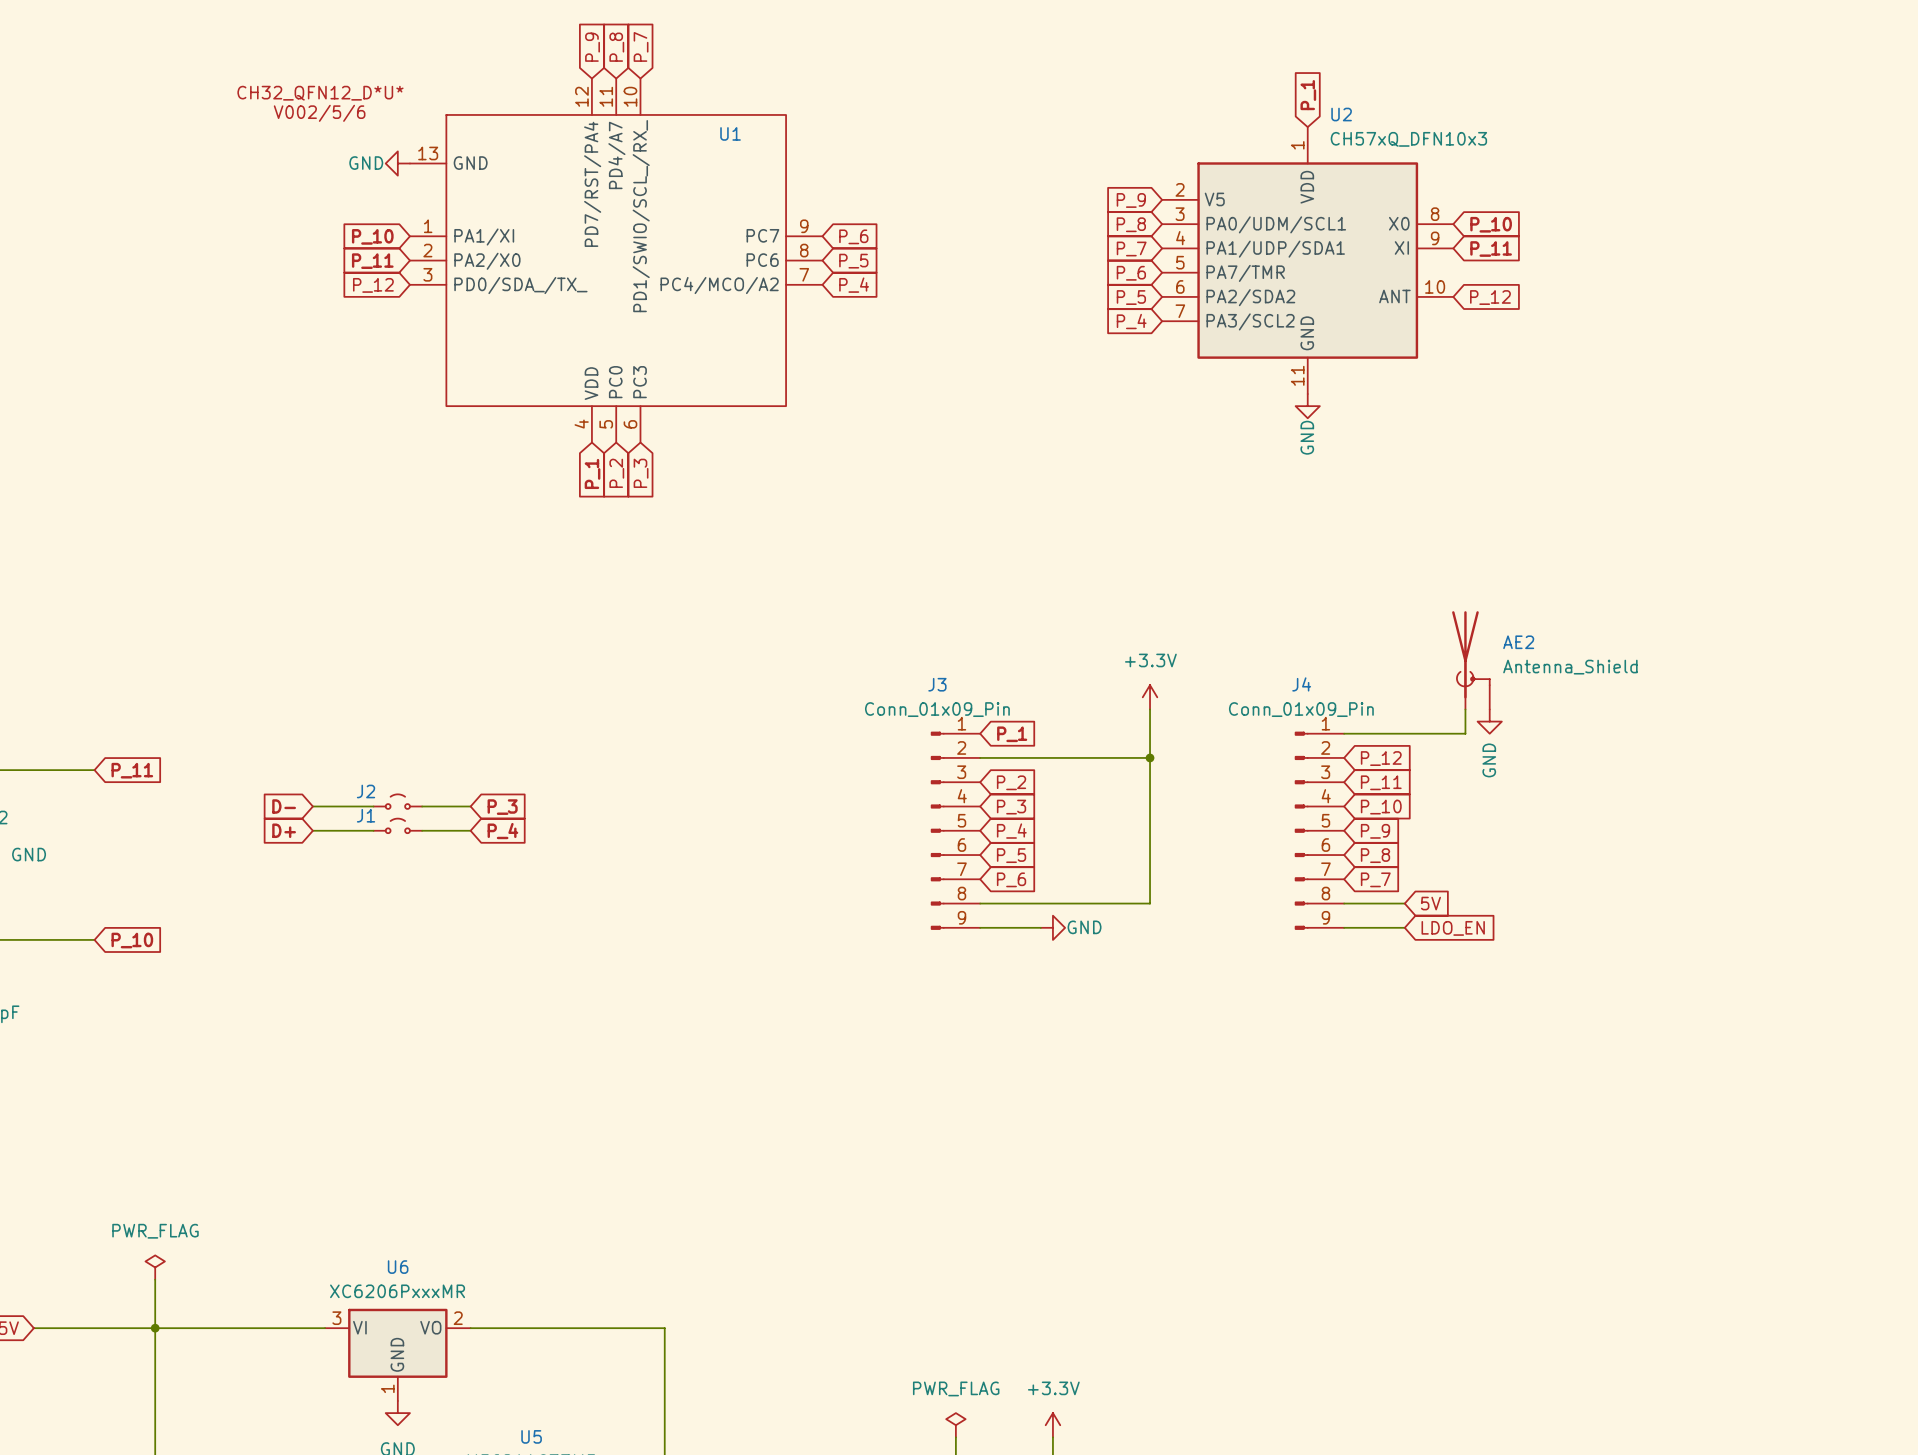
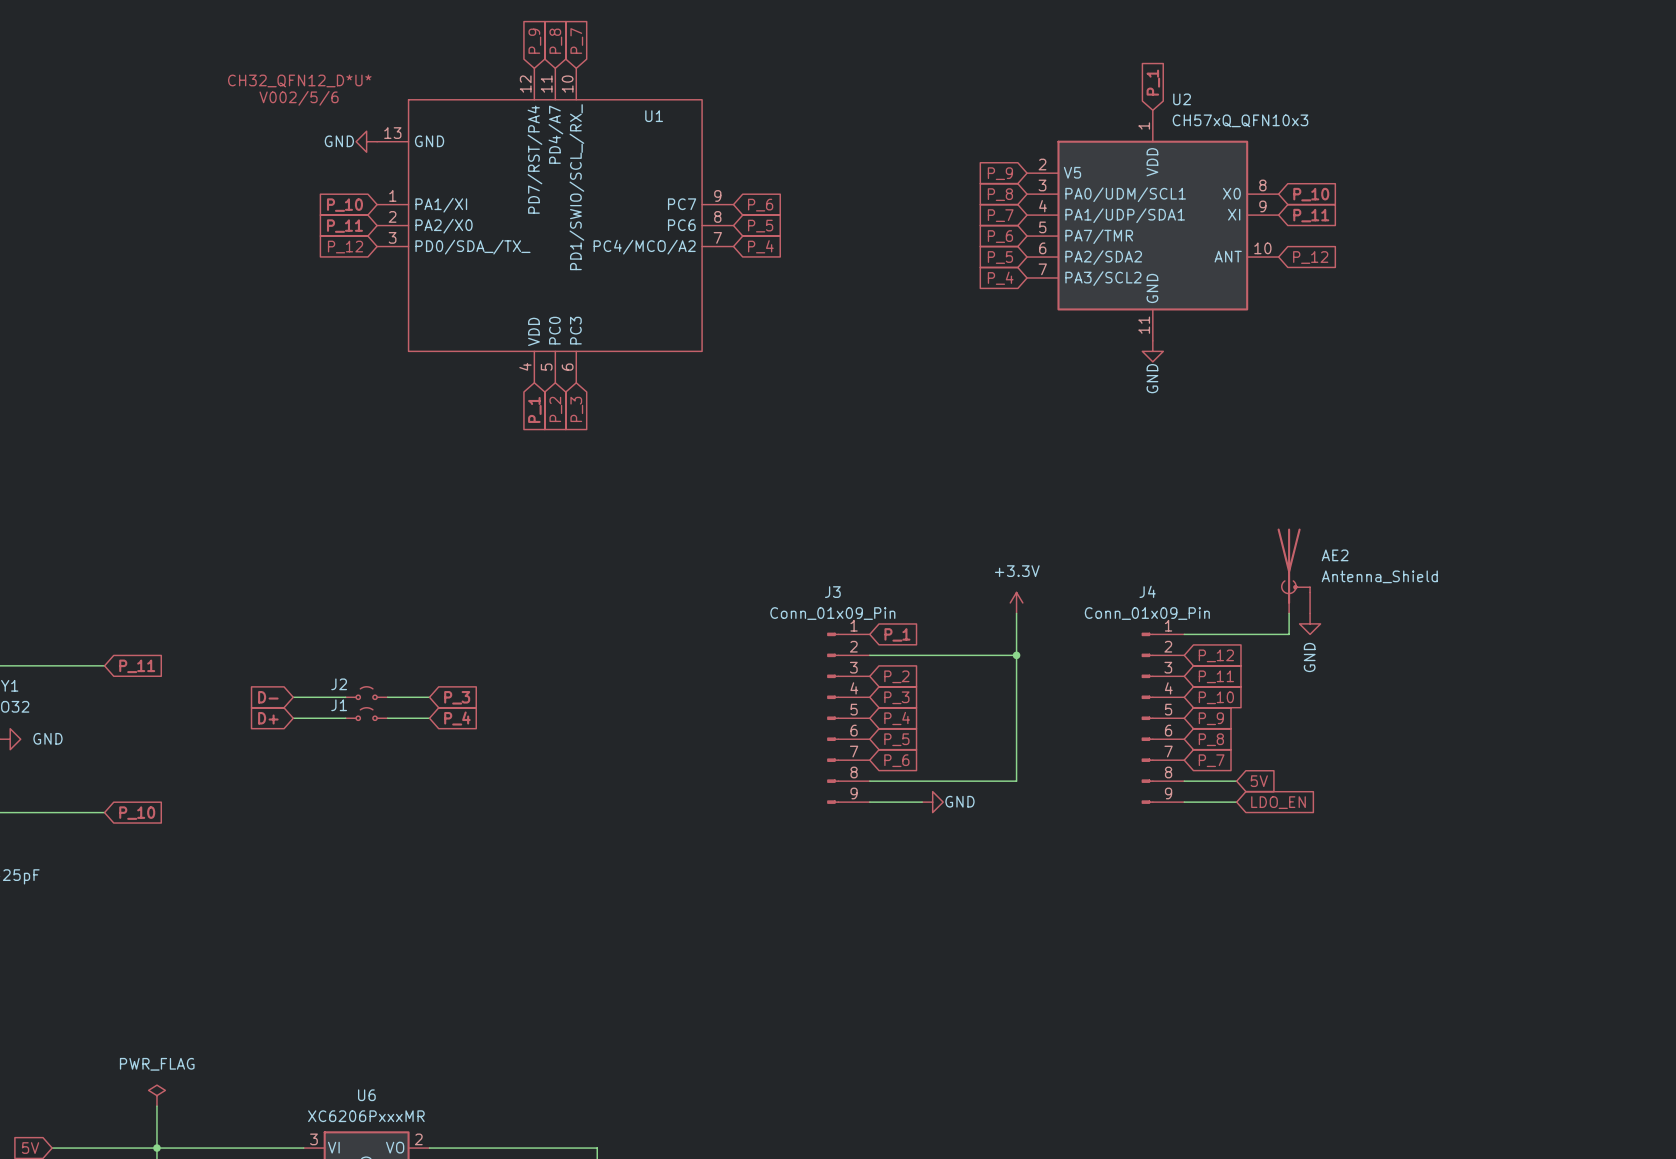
U2 value: CH57xQ_DFN10x3 (1408, 139) -> CH57xQ_QFN10x3 (1240, 120)

